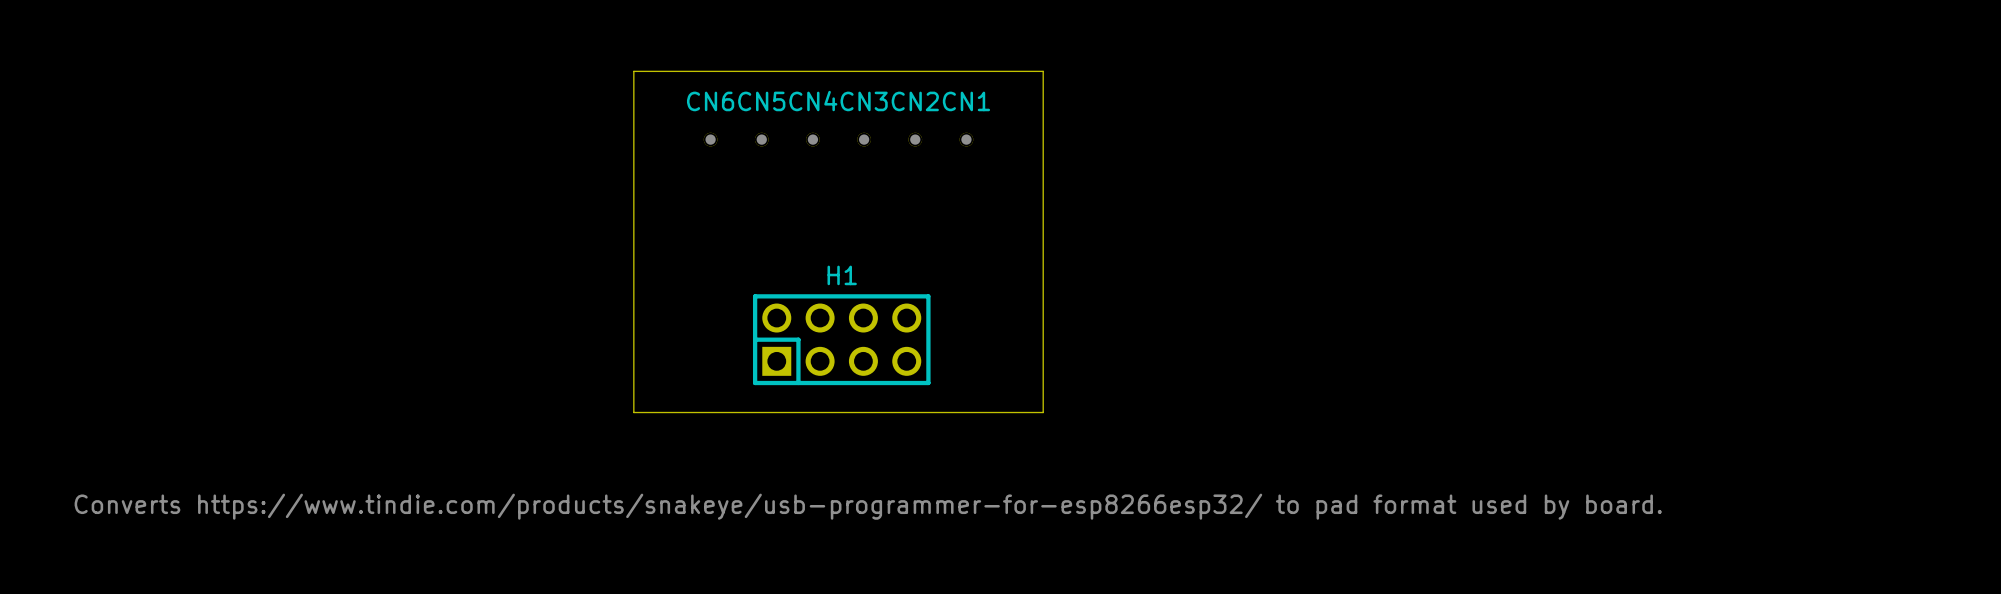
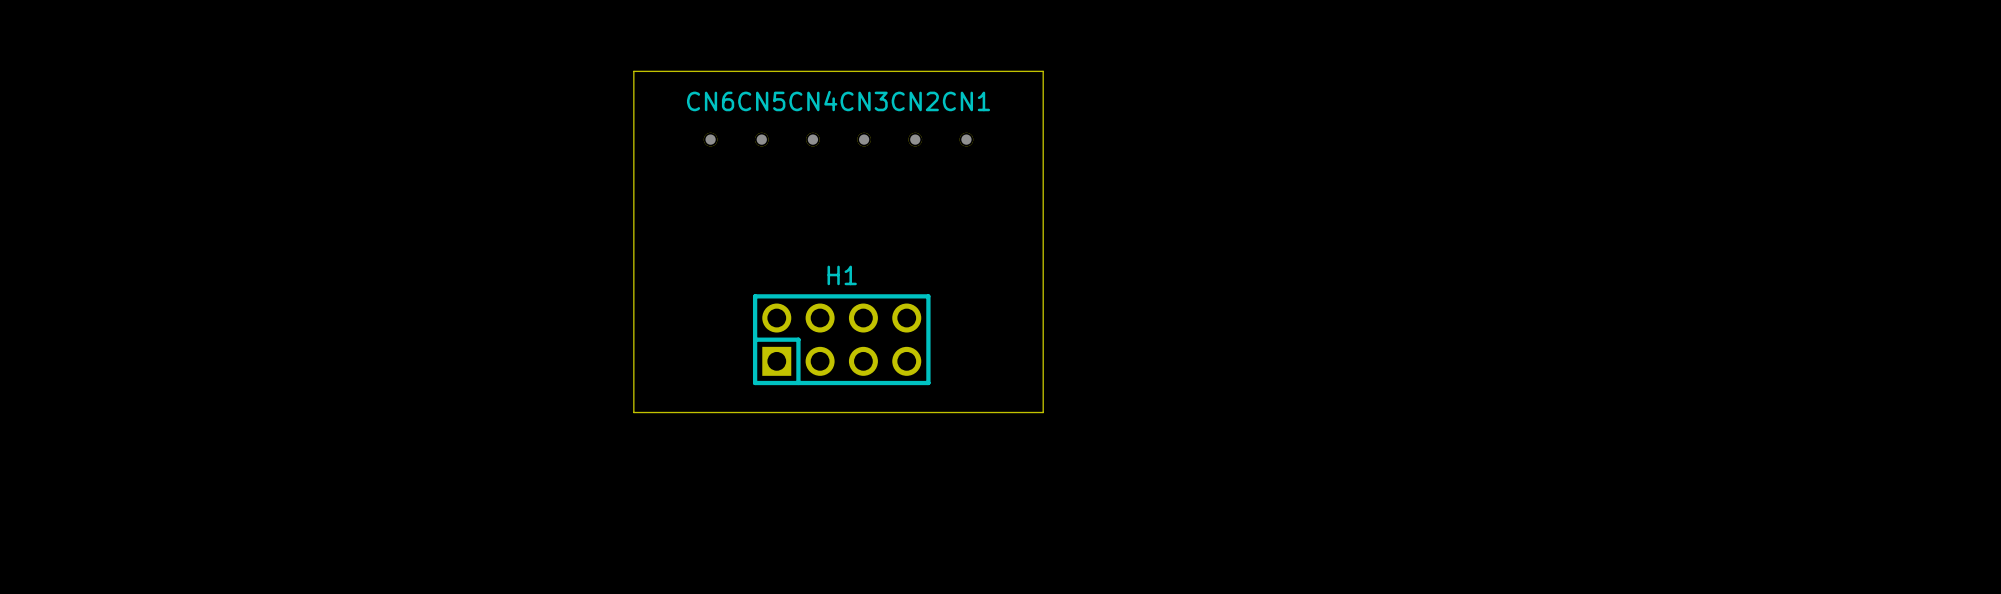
text: Converts https://www.tindie.com/products/snakeye/usb-programmer-for-esp8266esp32/ to pad format used by board. (868, 506) -> none

